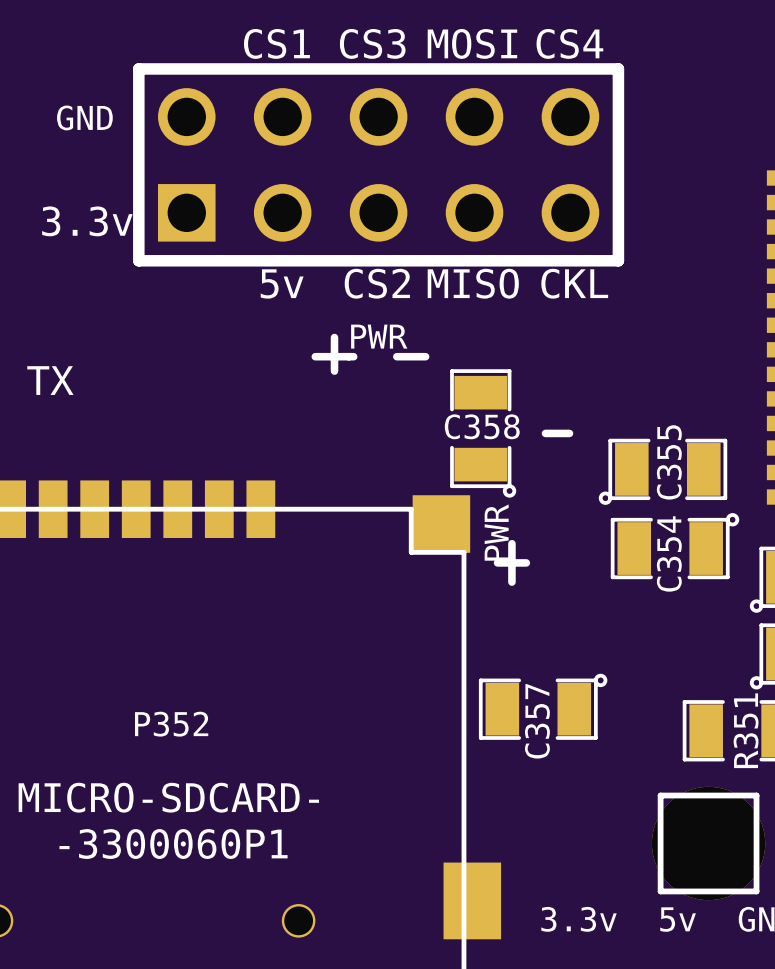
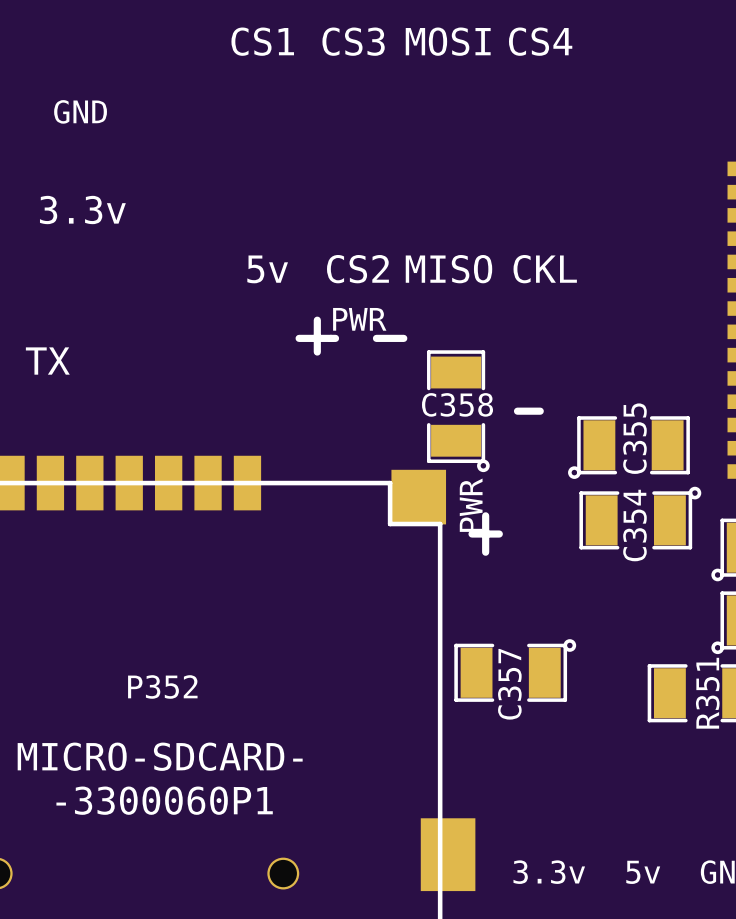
part: (378, 164) -> none
part: (708, 843) -> none

